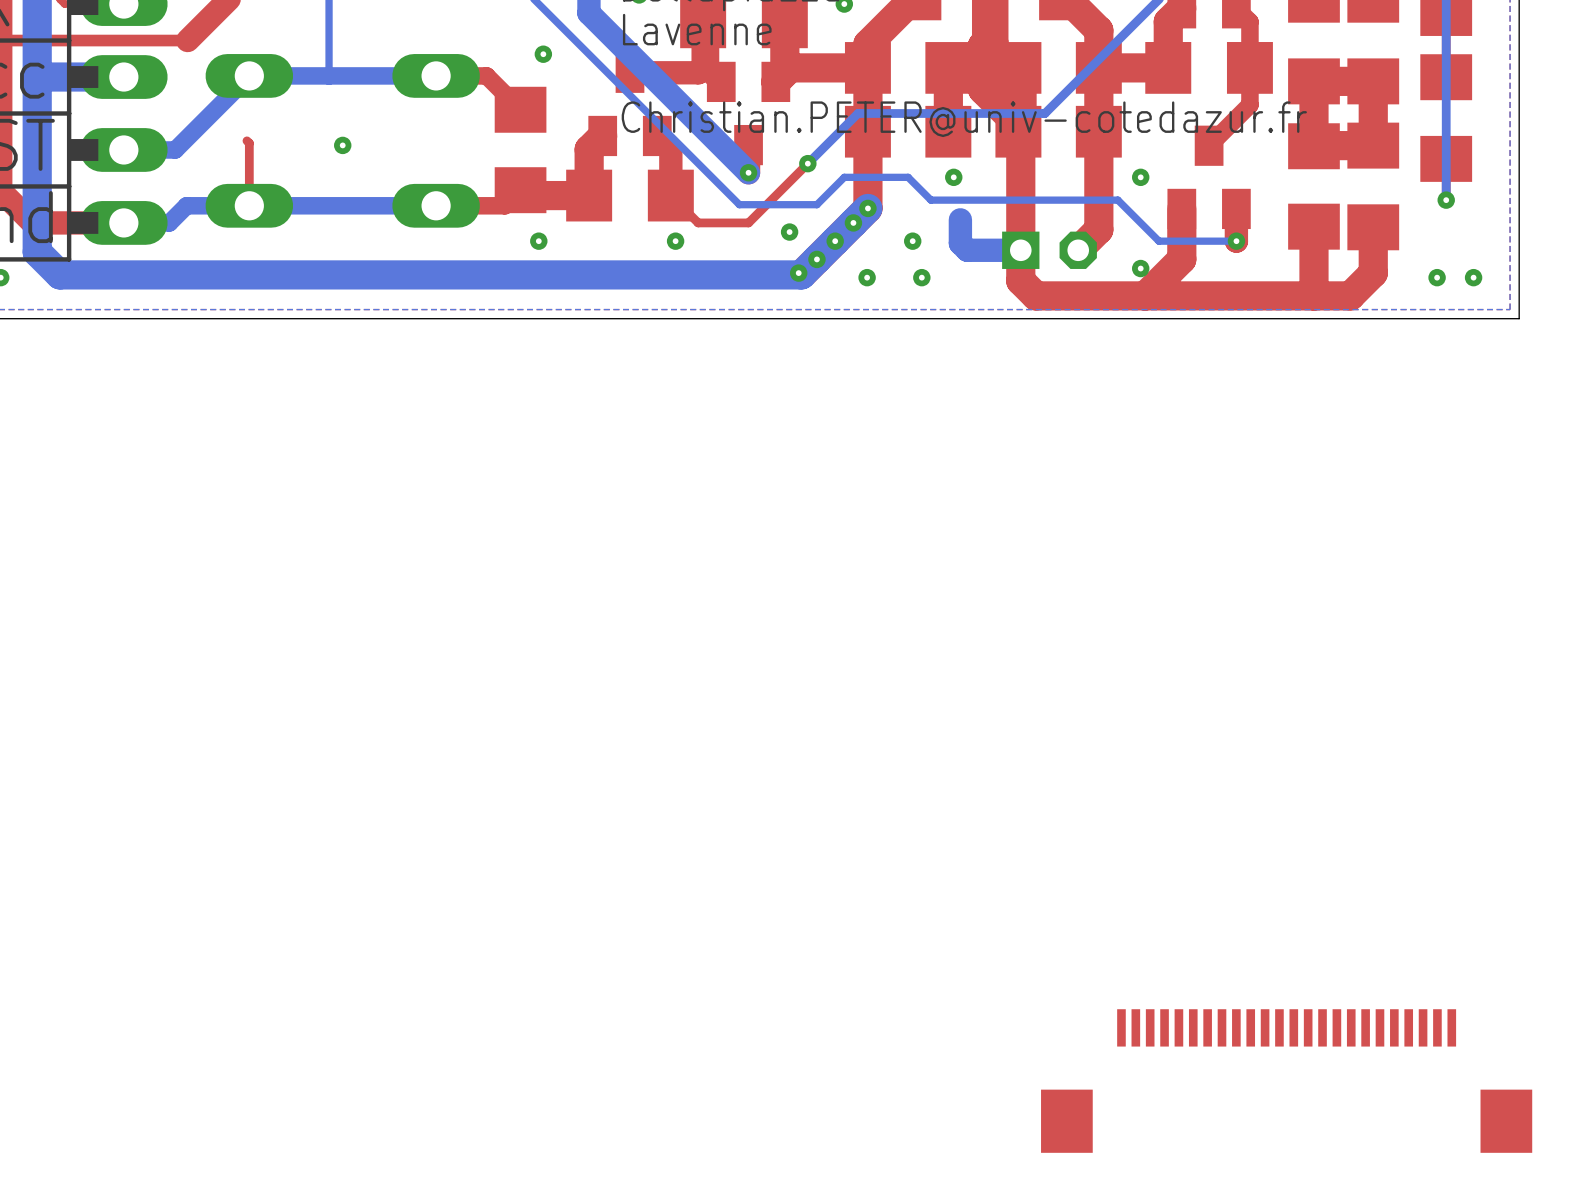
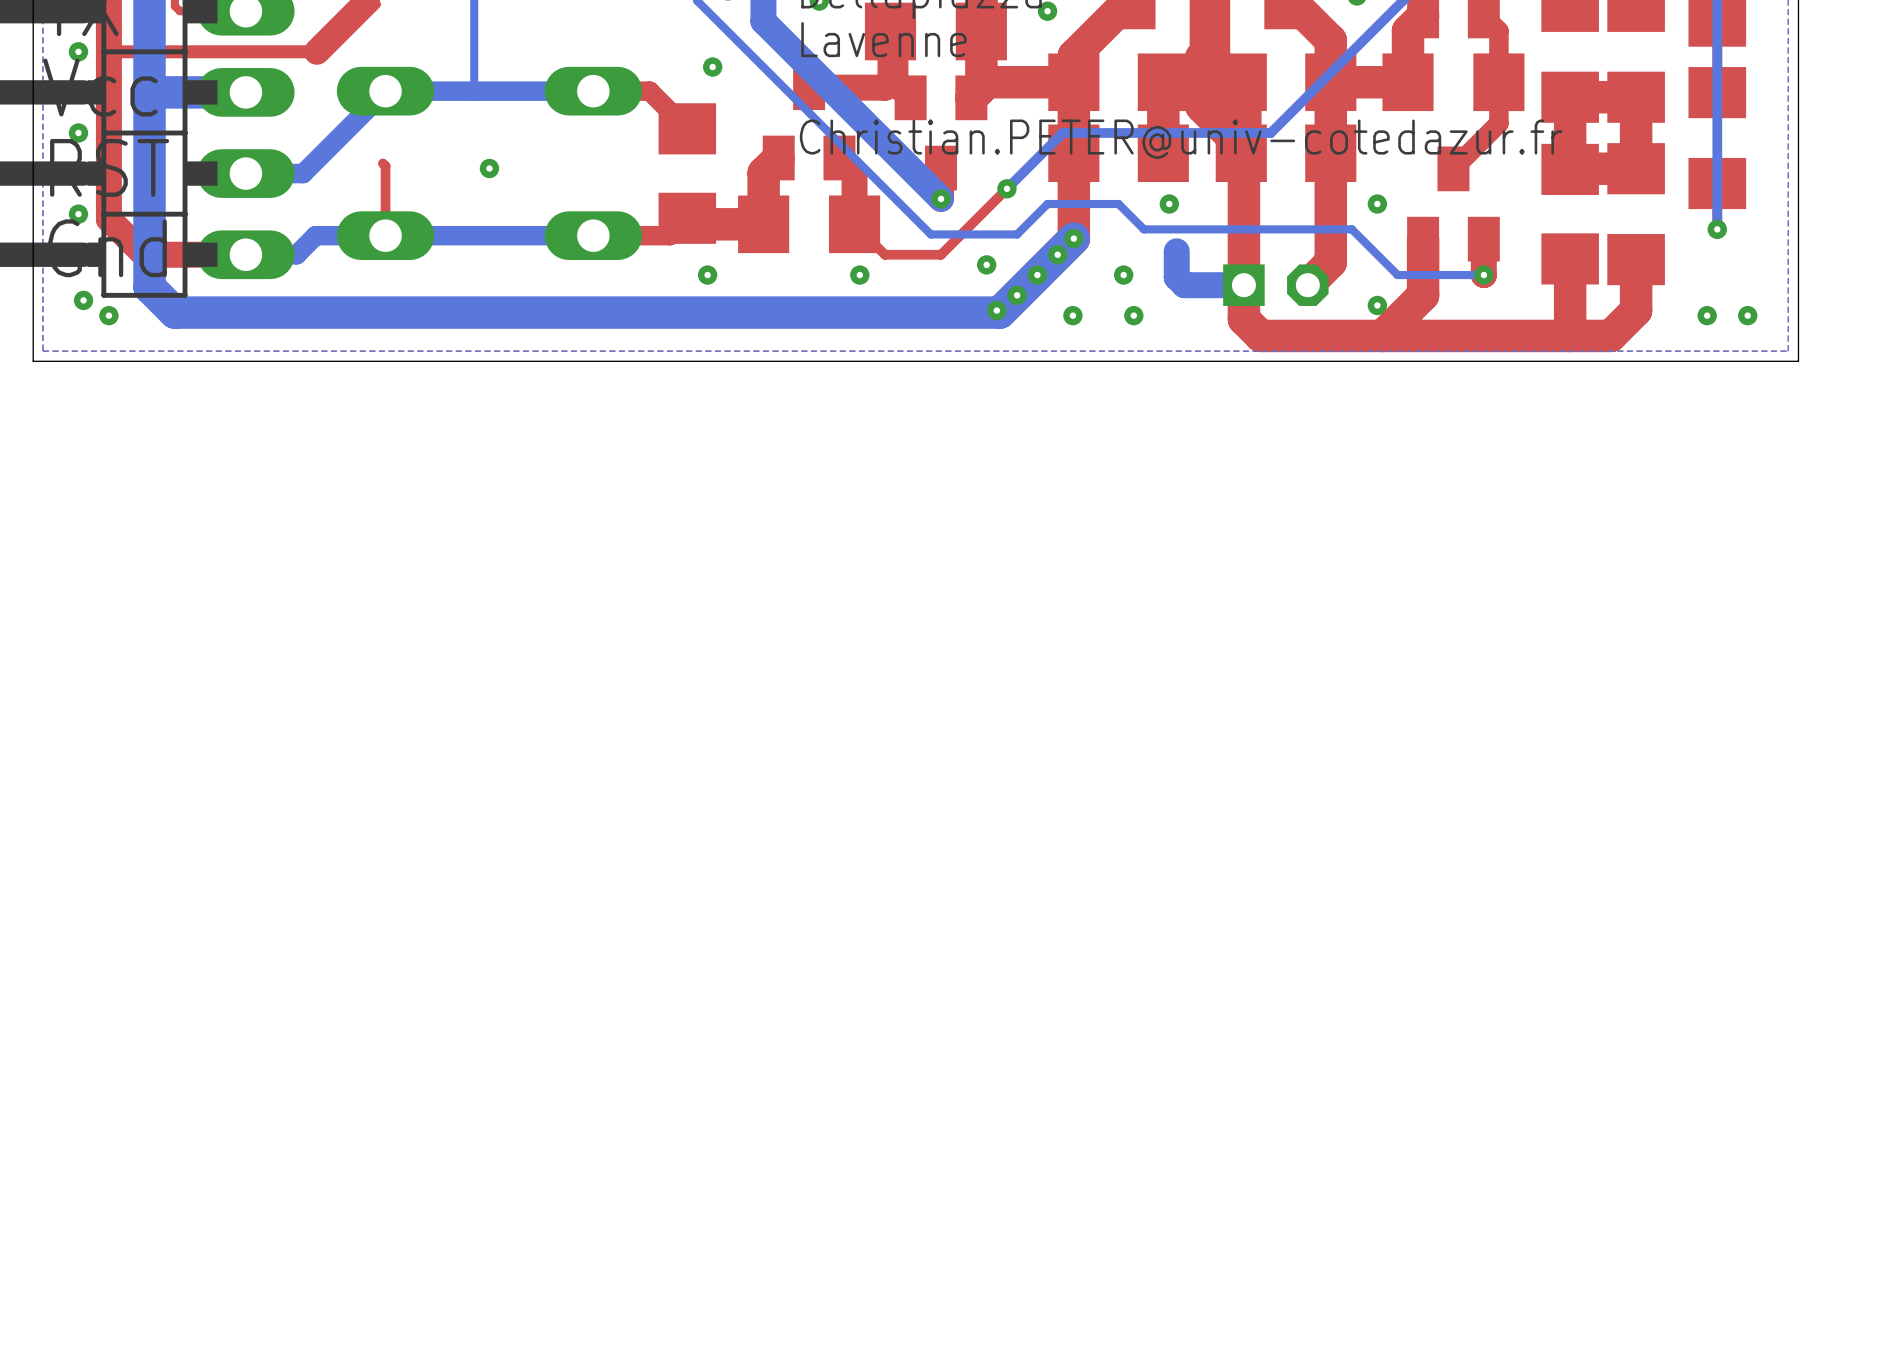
part: (1286, 1081) -> none

